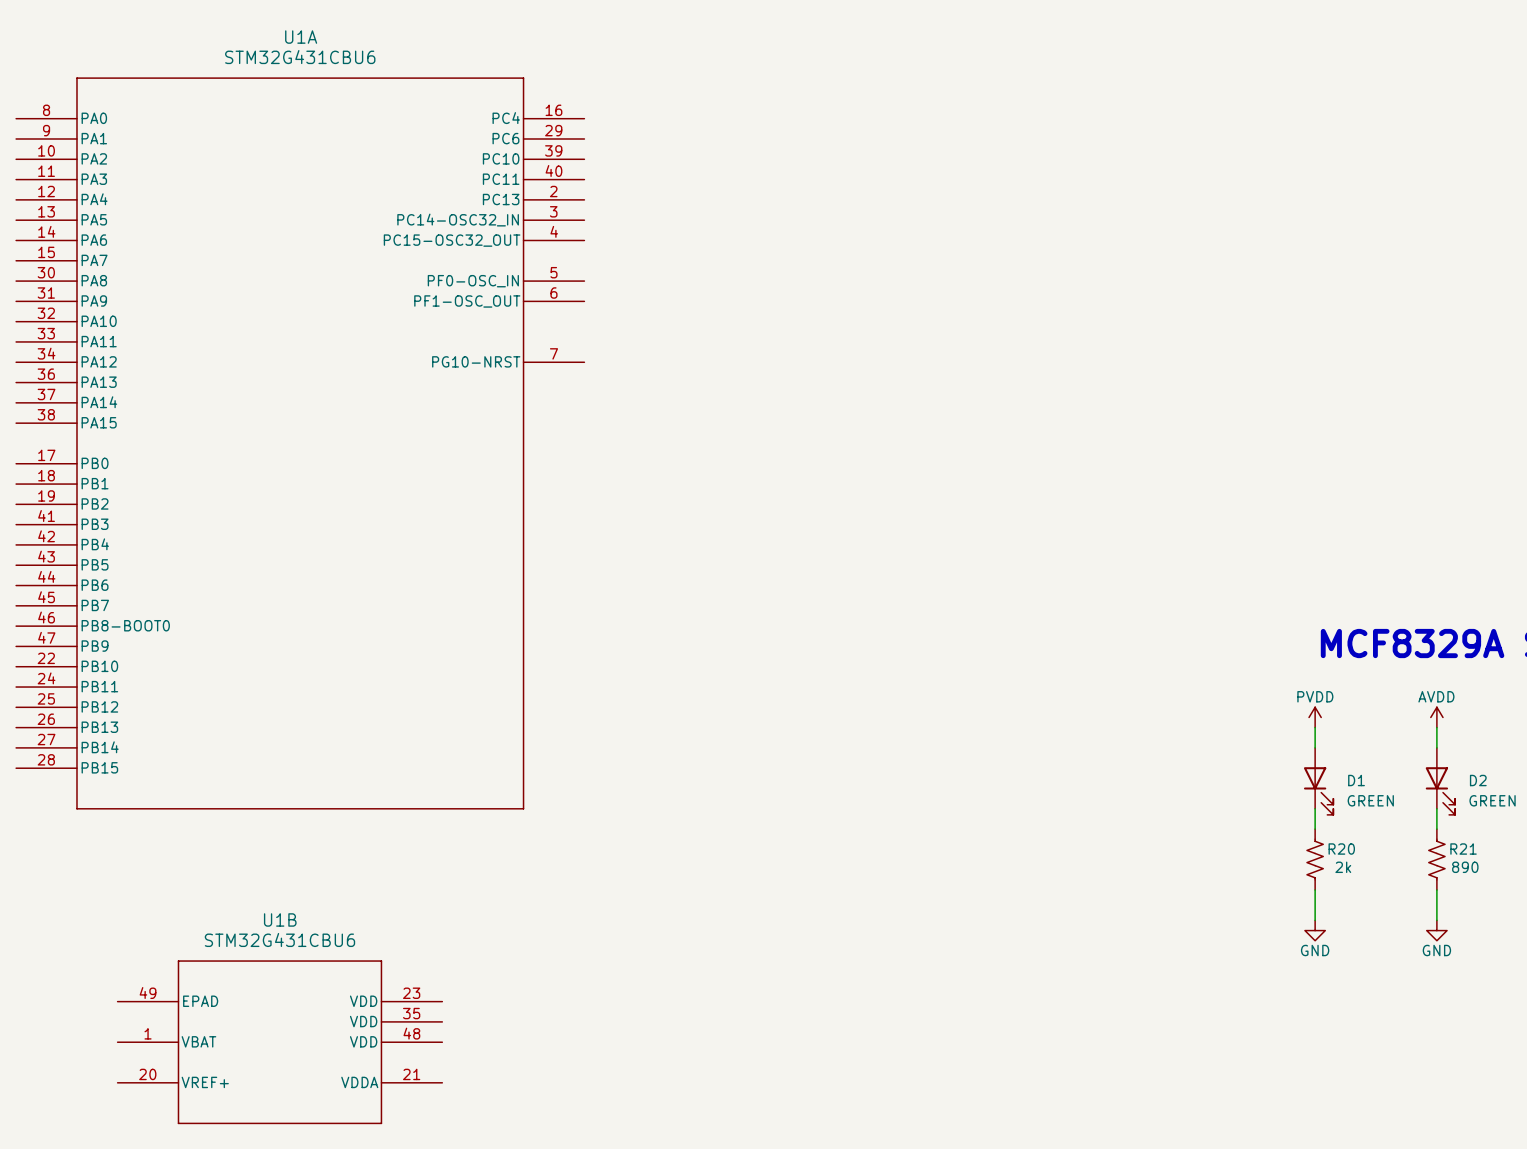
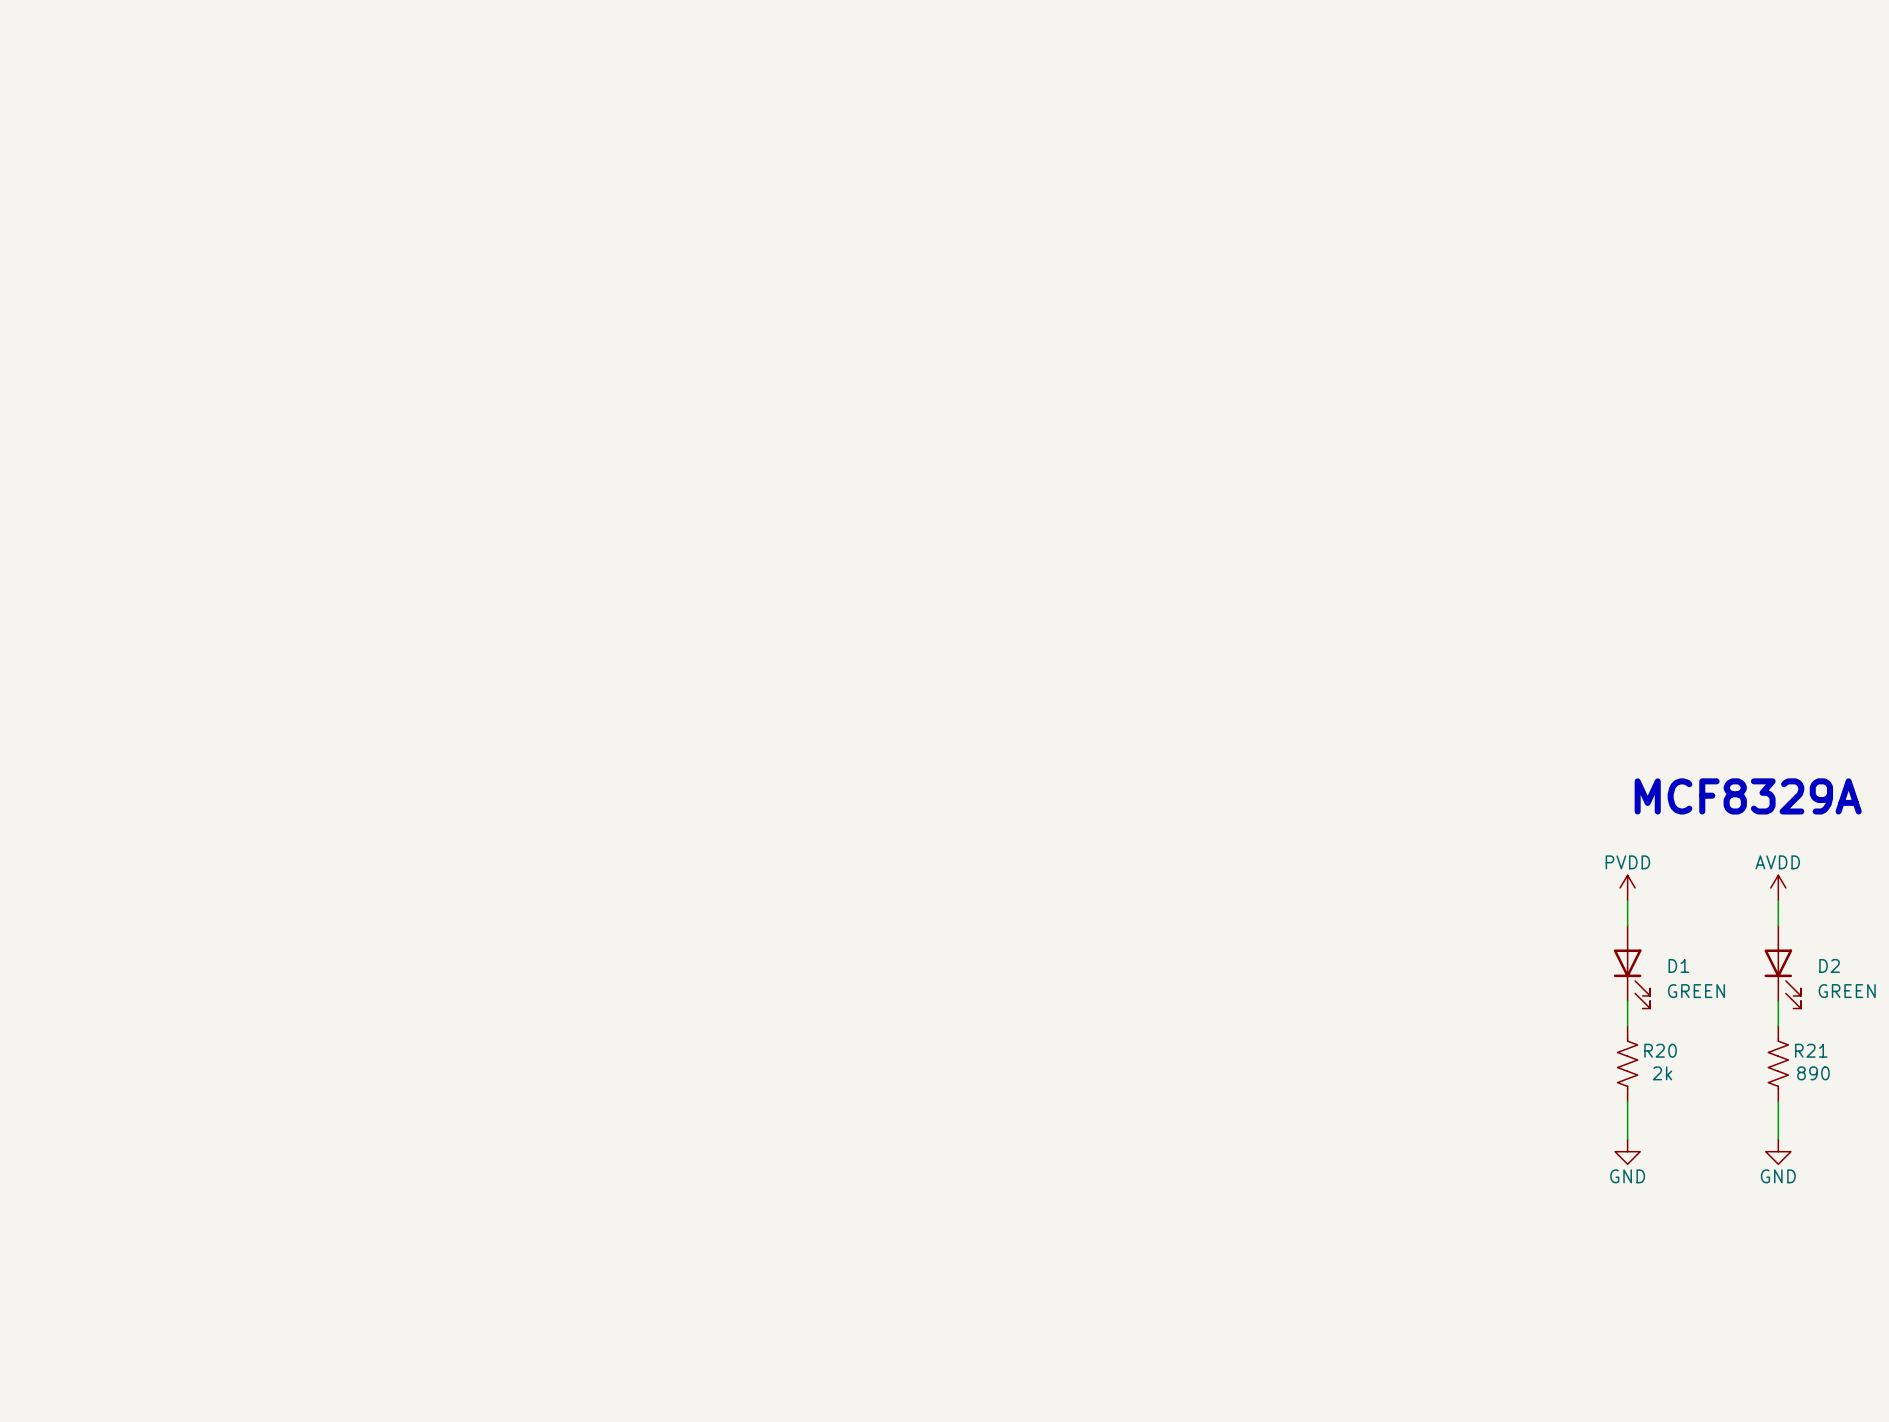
U1A: STM32G431CBU6 (300, 443) -> none
U1B: STM32G431CBU6 (279, 1042) -> none

